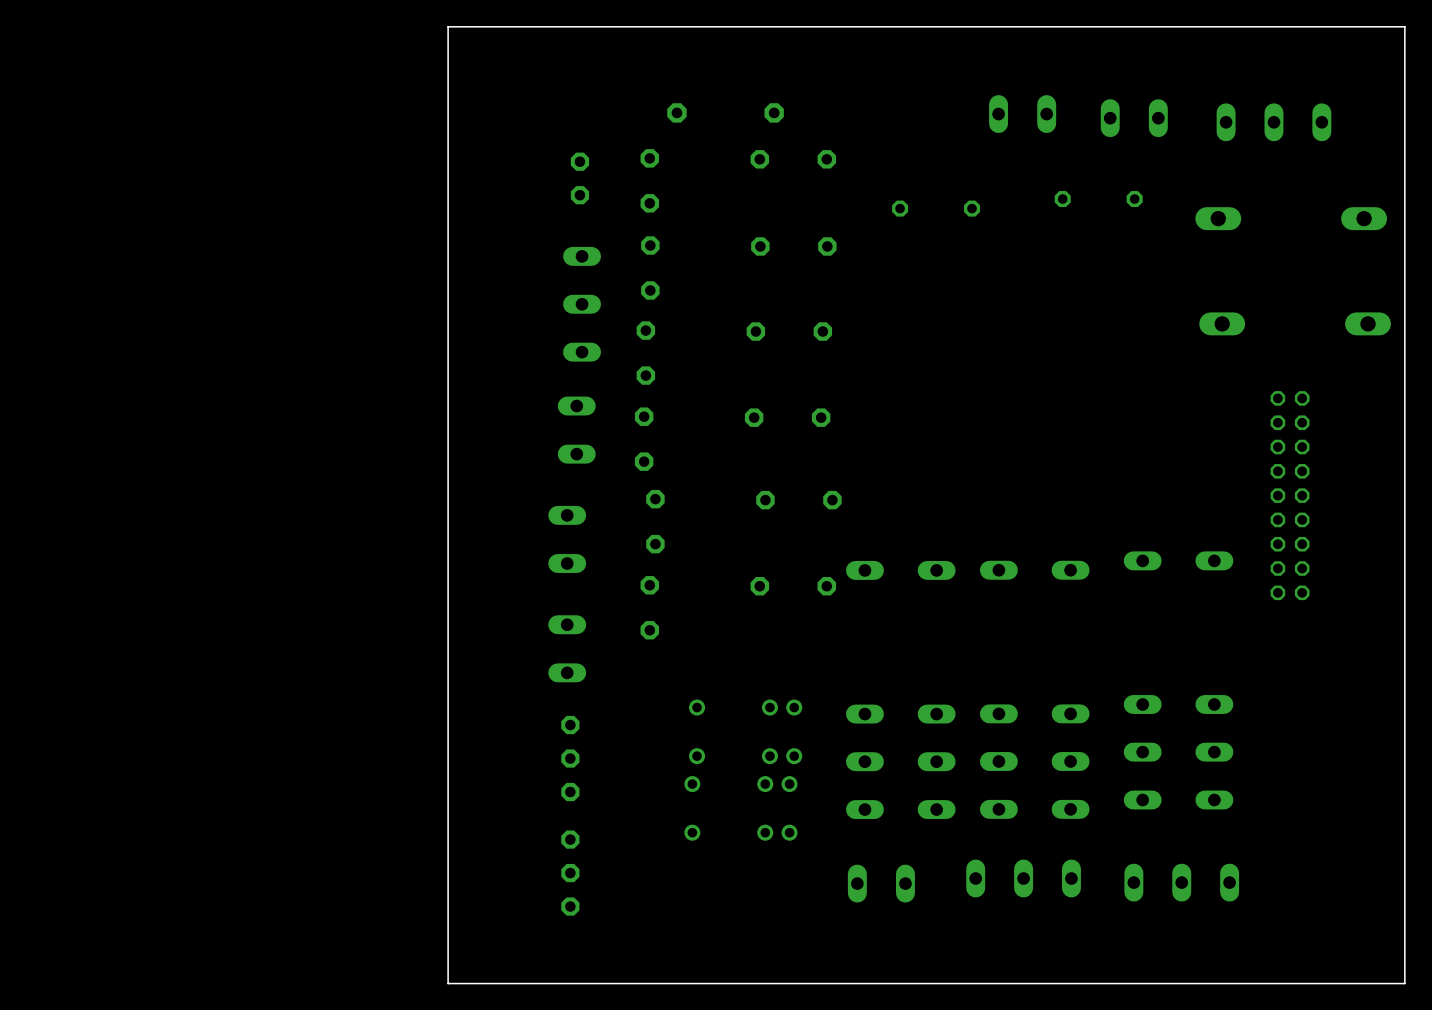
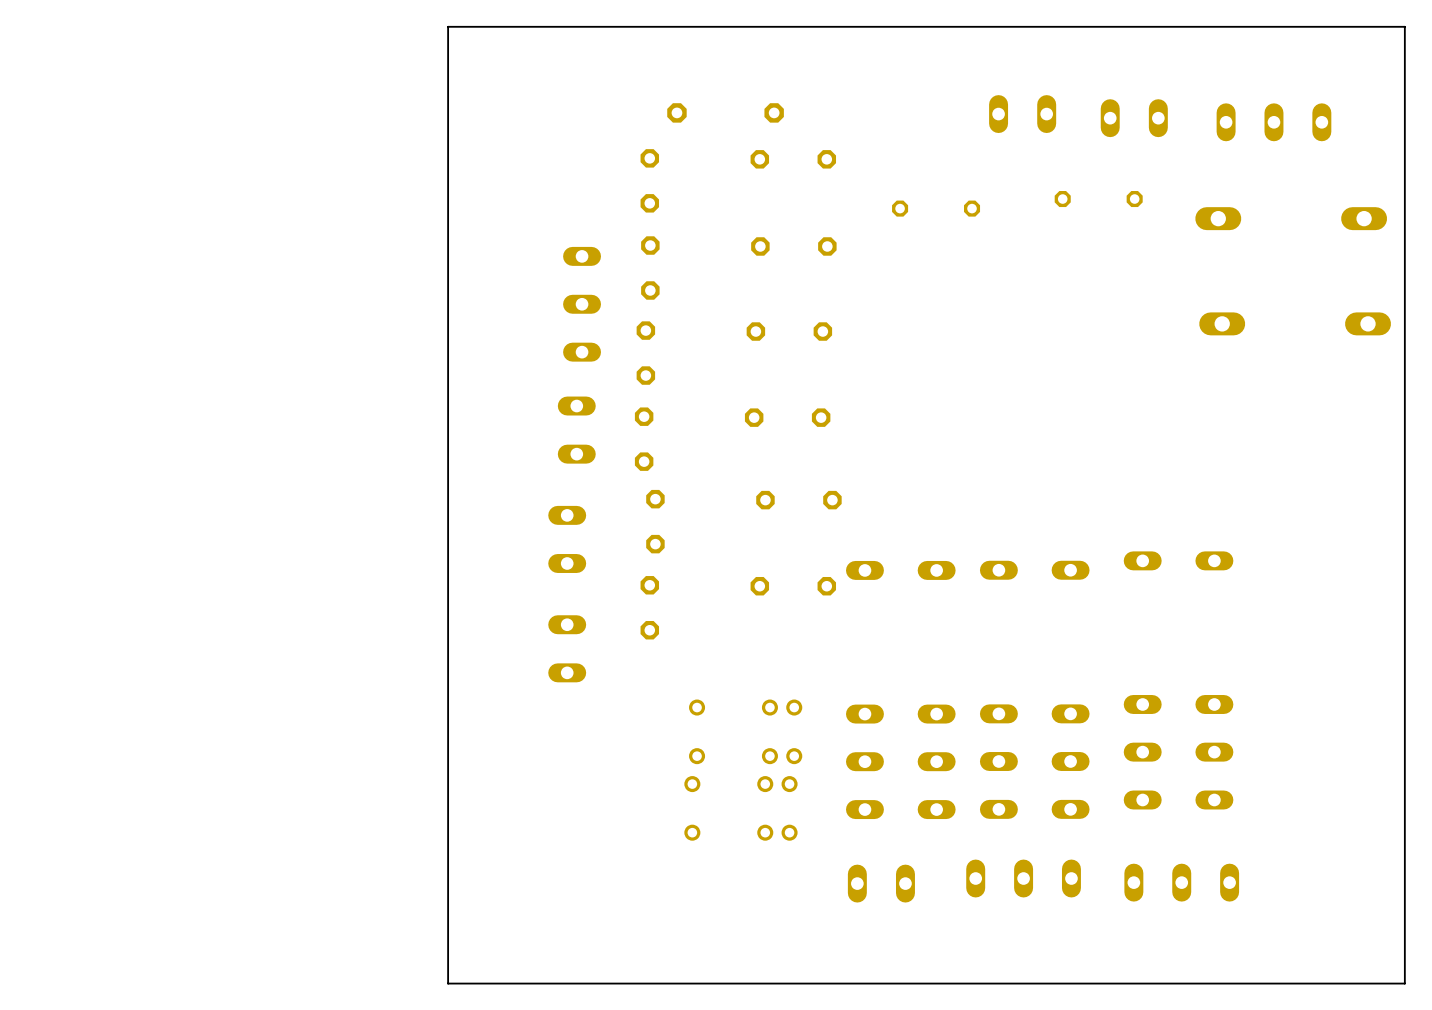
part: (579, 178) -> none
part: (1290, 495) -> none
part: (570, 758) -> none
part: (570, 873) -> none

